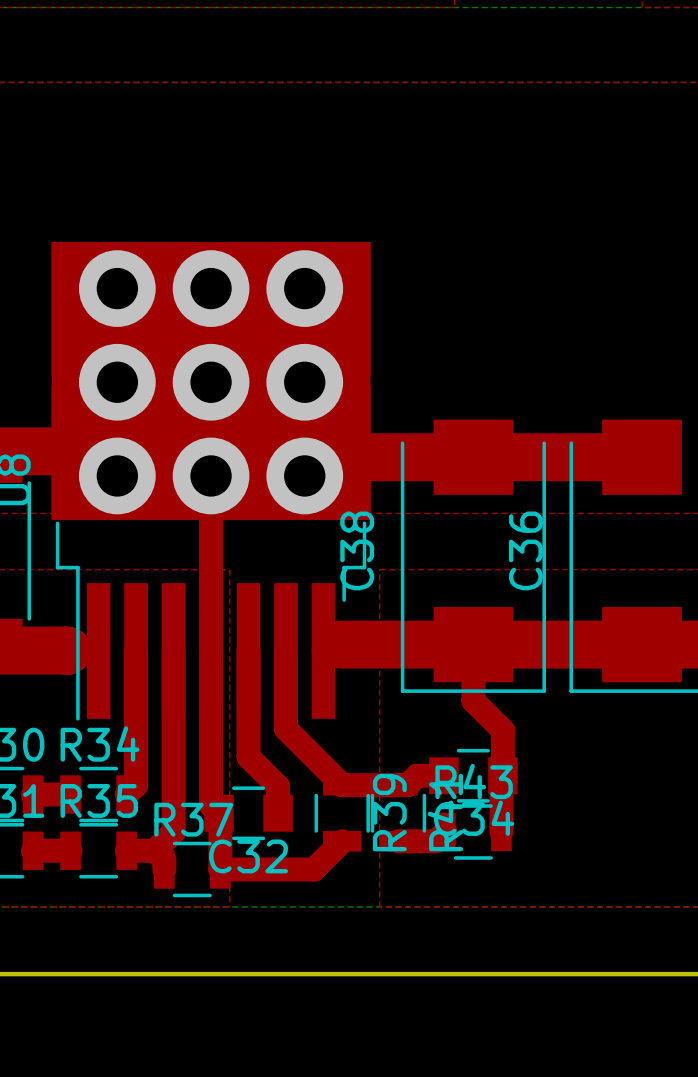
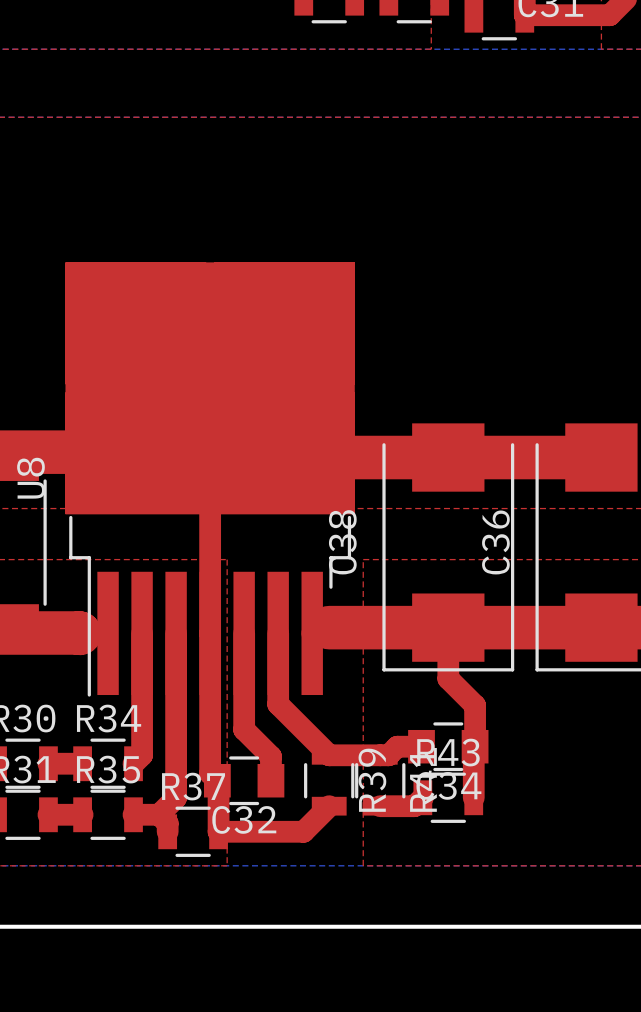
via: (117, 288) -> none
via: (211, 288) -> none
via: (304, 288) -> none
via: (117, 382) -> none
via: (211, 382) -> none
via: (304, 382) -> none
via: (117, 475) -> none
via: (211, 475) -> none
via: (304, 475) -> none

